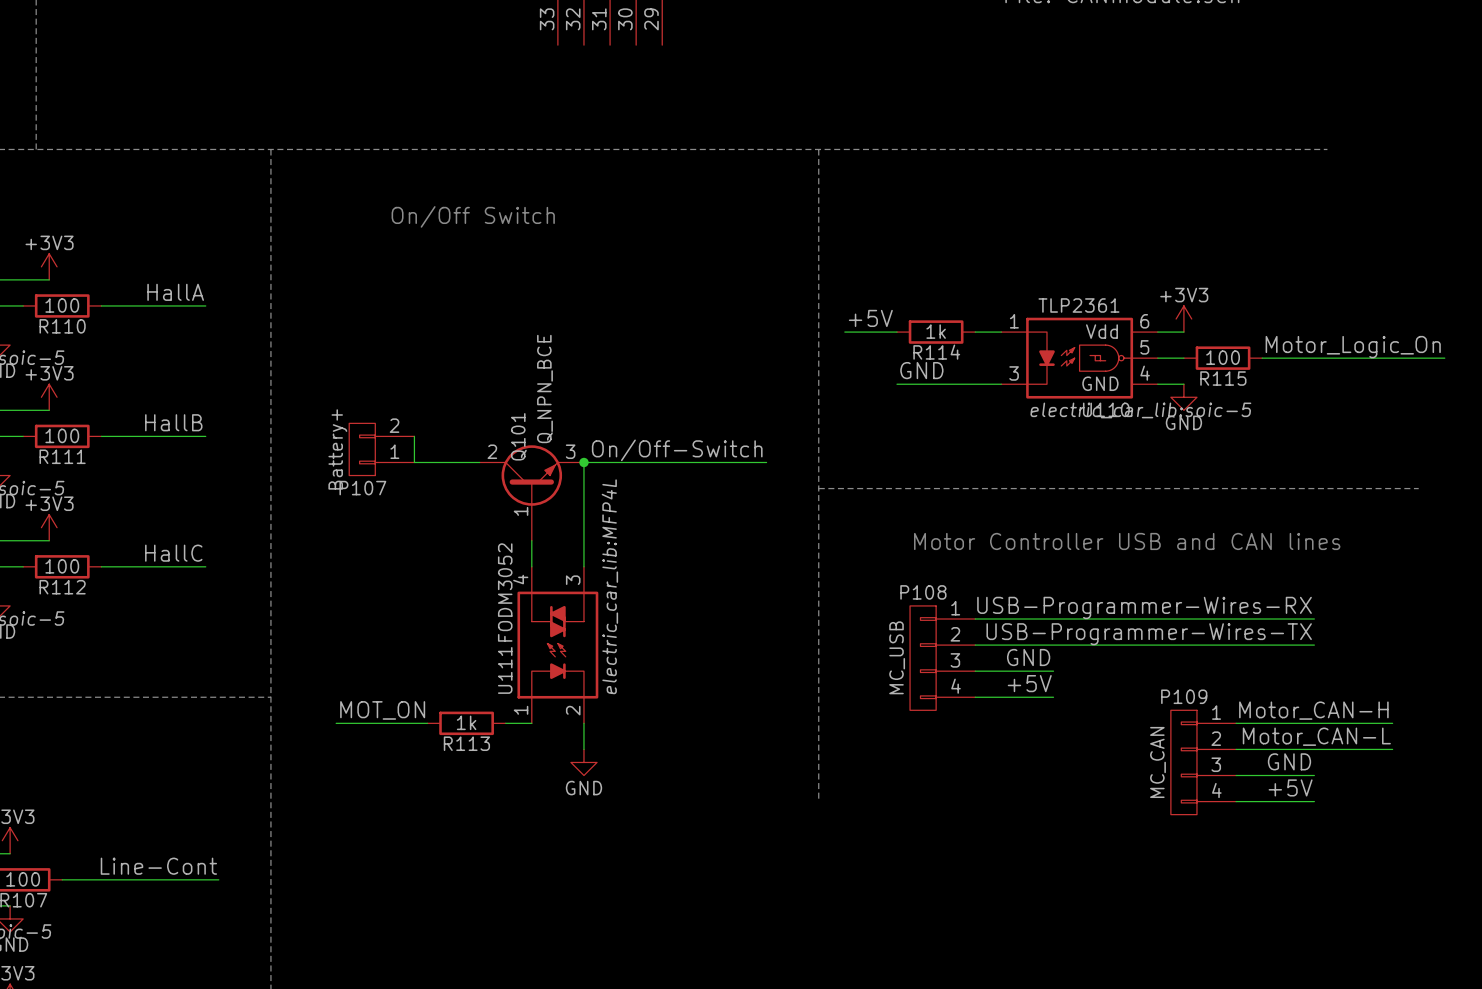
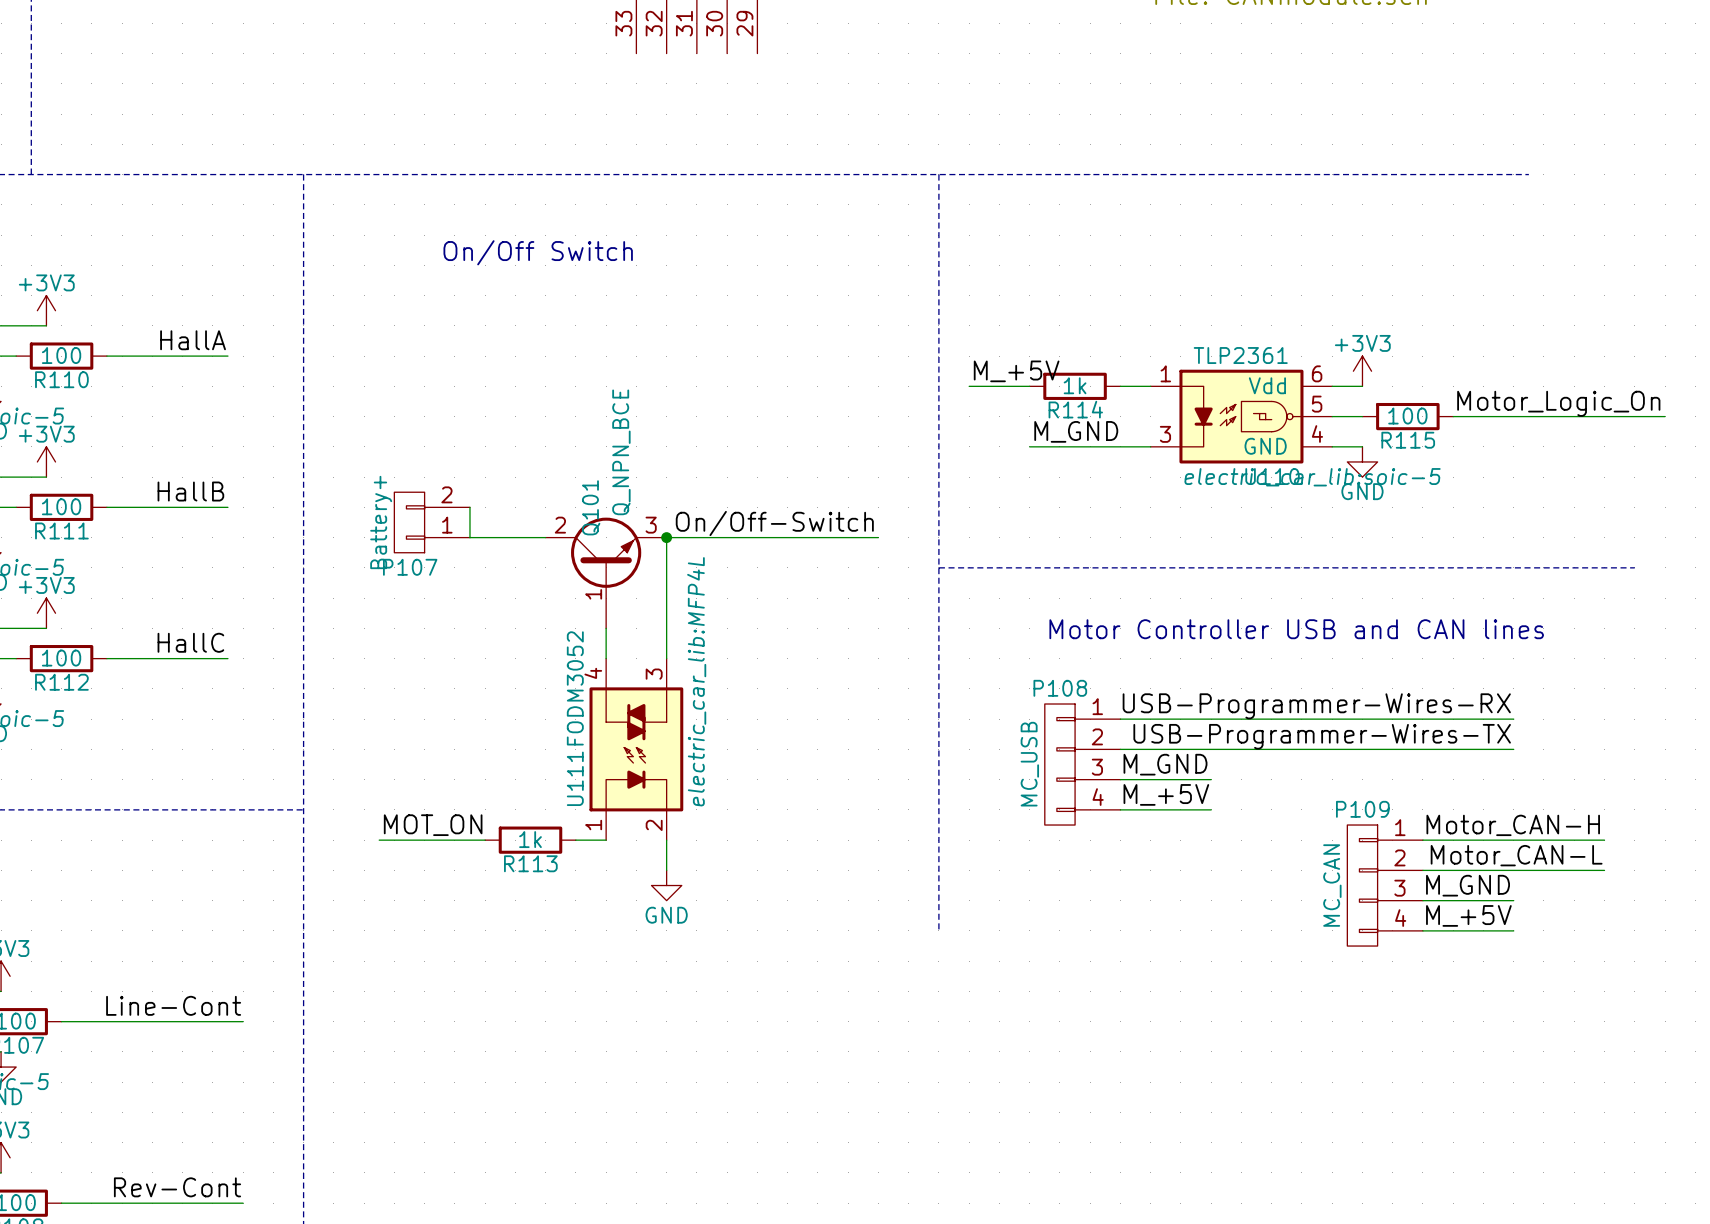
label: +5V (870, 318) -> M_+5V (1016, 371)
label: GND (921, 370) -> M_GND (1076, 431)
label: GND (1028, 657) -> M_GND (1165, 764)
label: +5V (1029, 683) -> M_+5V (1166, 794)
label: GND (1289, 761) -> M_GND (1468, 885)
label: +5V (1290, 787) -> M_+5V (1468, 915)

